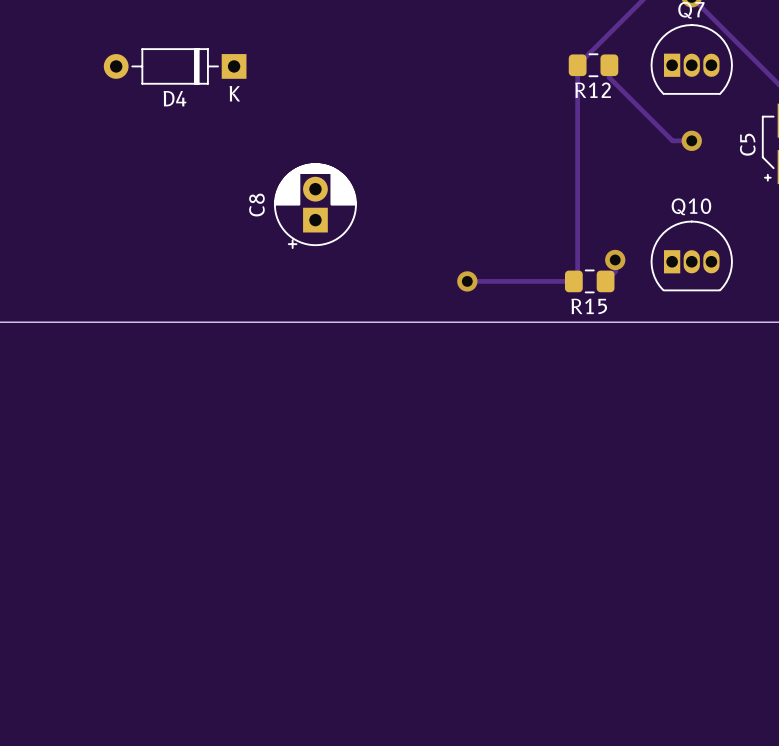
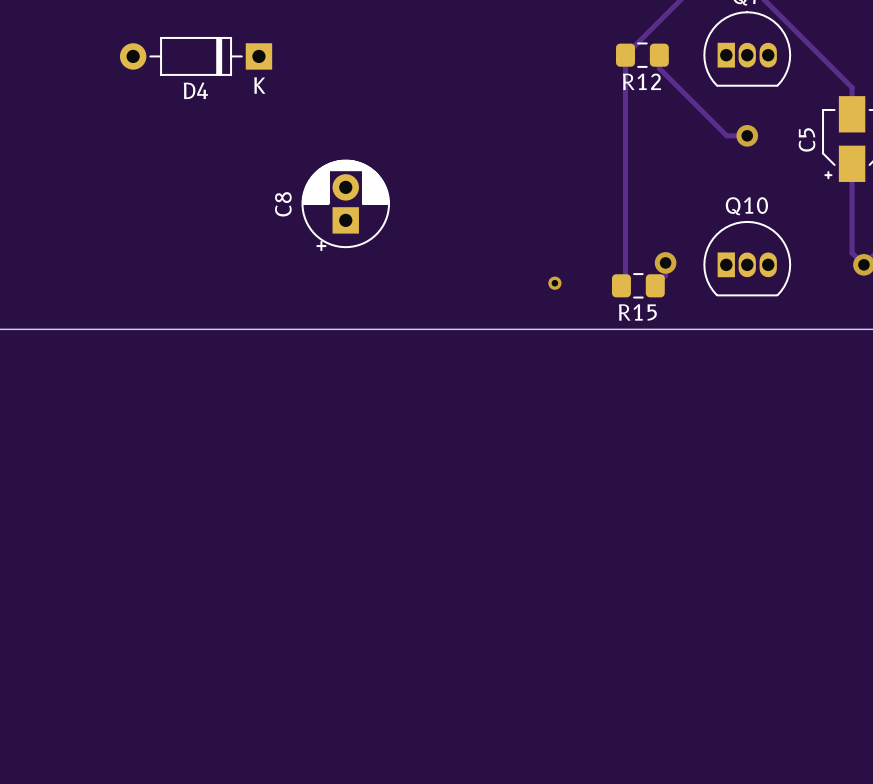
via: none -> (554, 283)
track: (467, 281) (573, 281) -> none
via: (467, 281) -> none

